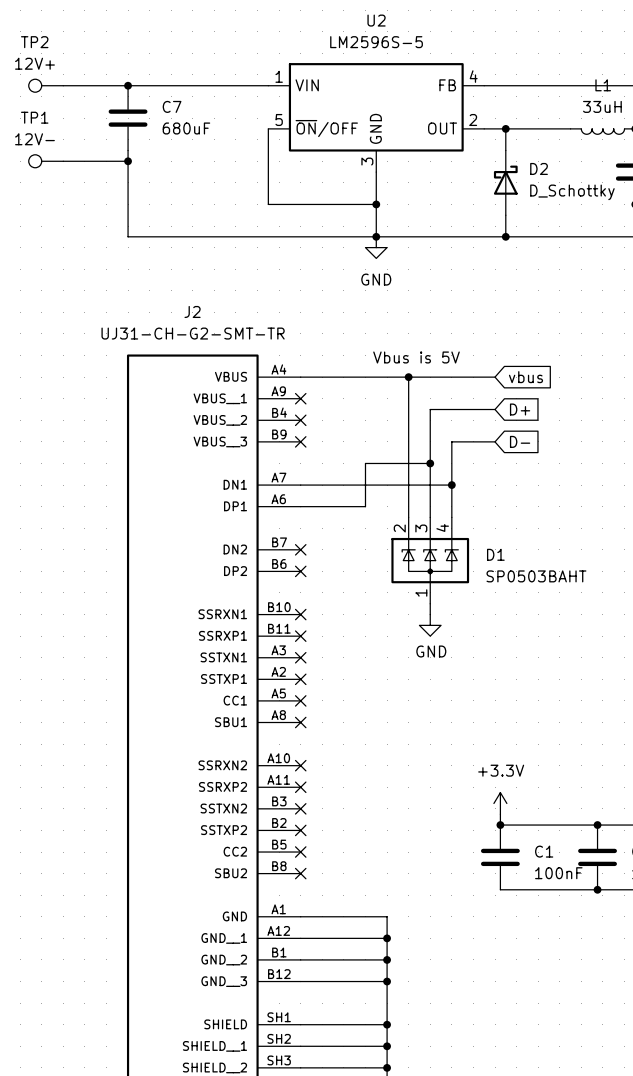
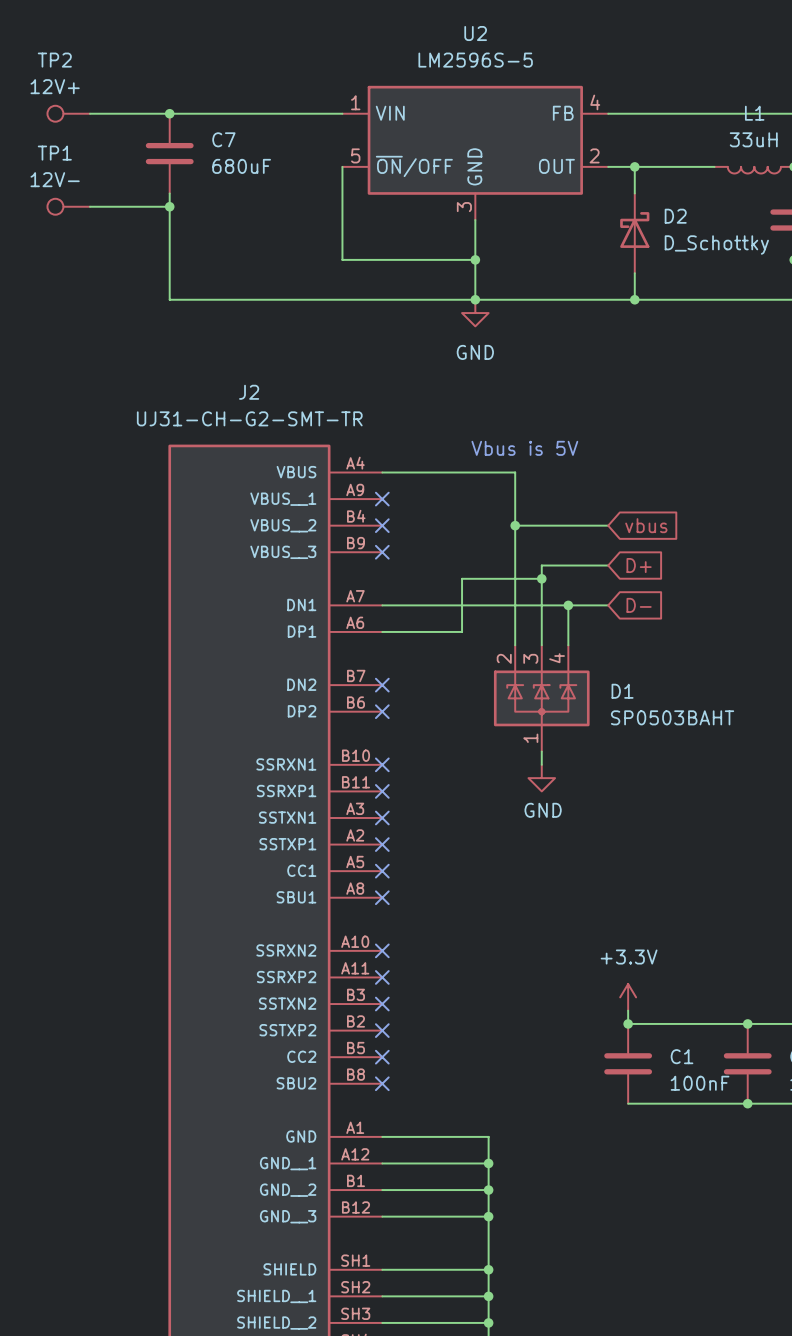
wire: (408, 377) (495, 377) -> none
junction position: (408, 377) -> (515, 525)
global label position: vbus (525, 377) -> vbus (646, 525)
wire: (495, 409) (430, 409) (430, 452) -> (608, 565) (541, 565)
global label position: D+ (520, 409) -> D+ (639, 565)
wire: none -> (515, 525) (608, 525)
wire: (495, 441) (451, 441) (451, 485) -> (608, 605) (568, 605)
global label position: D- (520, 441) -> D- (639, 605)

